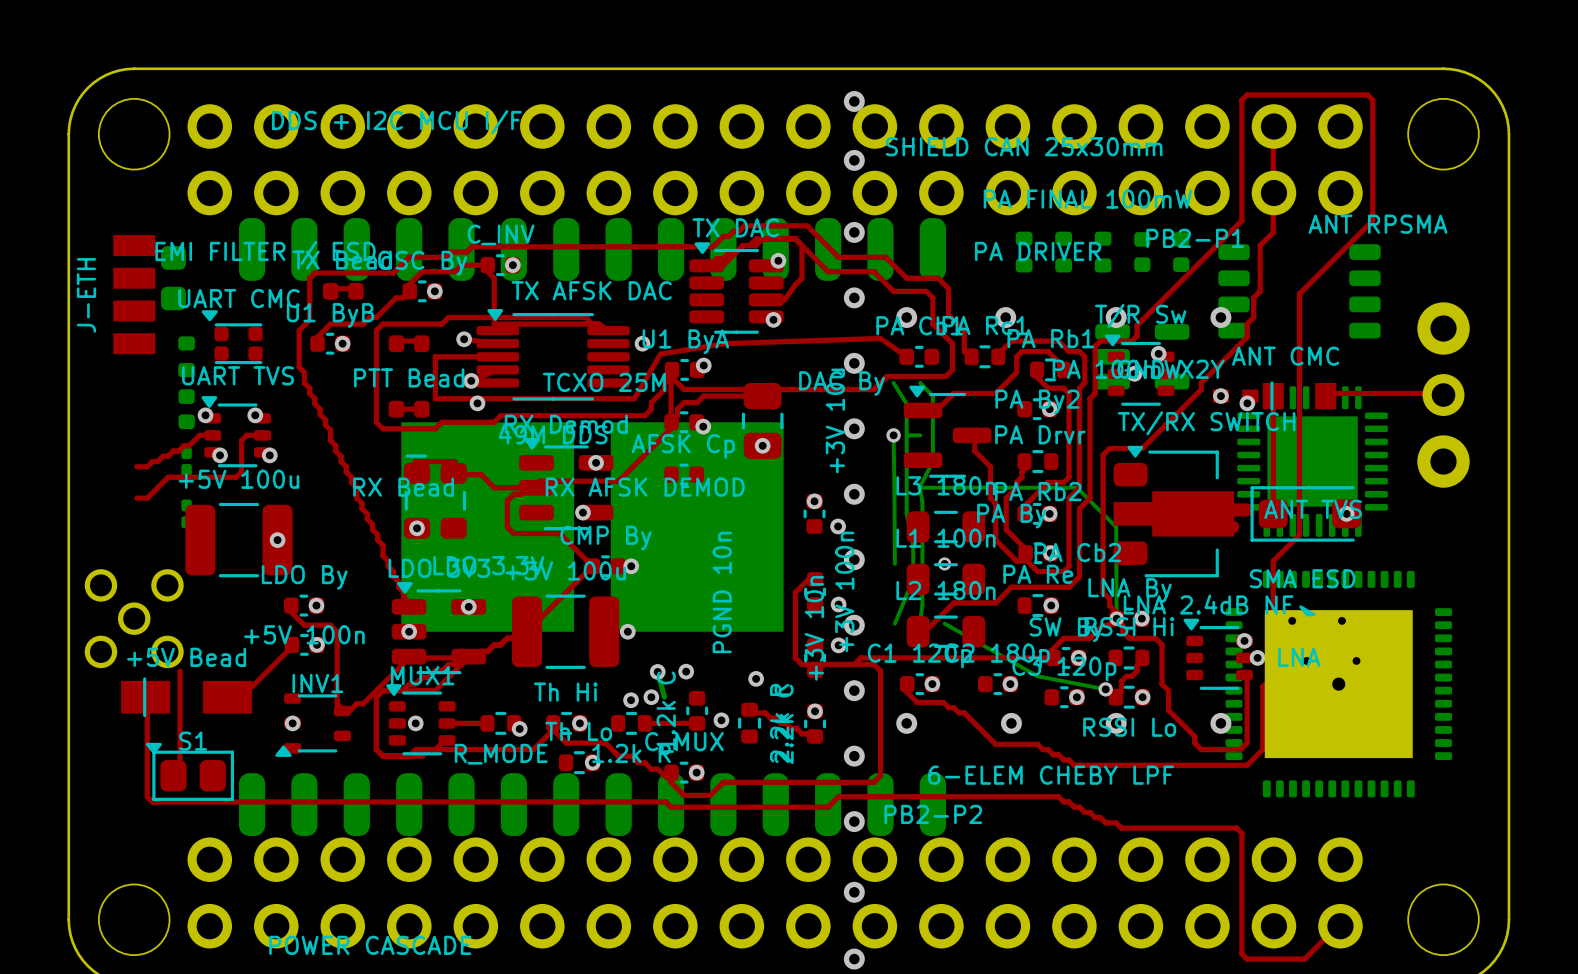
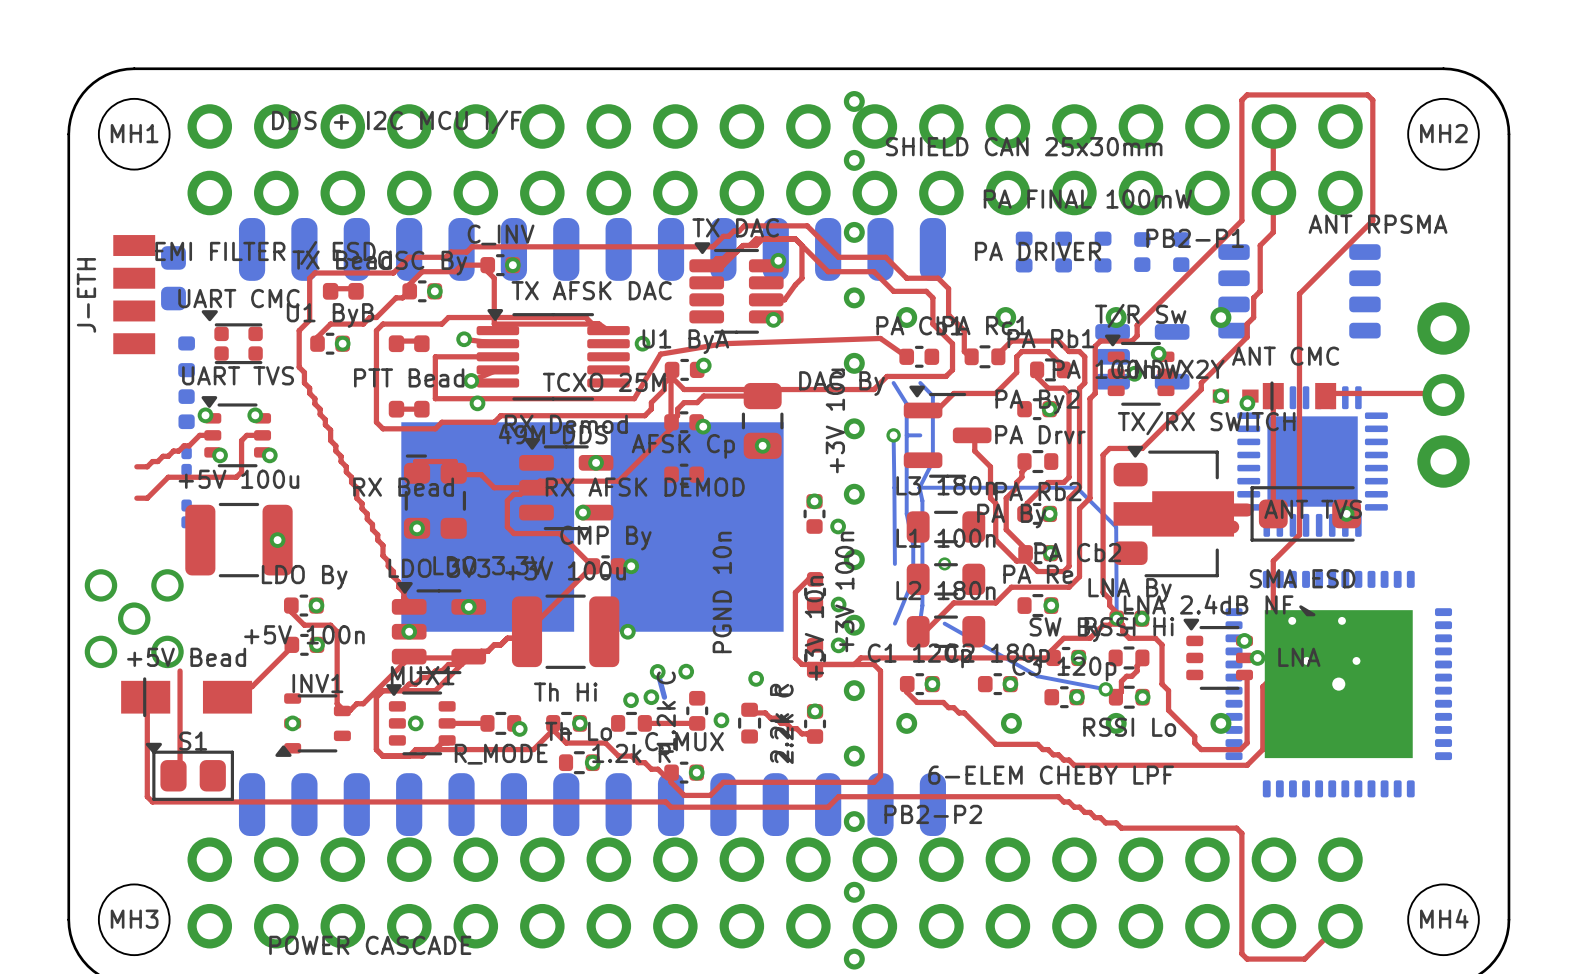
MH1 name: none -> MH1 (134, 133)
MH2 name: none -> MH2 (1443, 133)
MH4 name: none -> MH4 (1444, 918)
MH3 name: none -> MH3 (134, 919)

